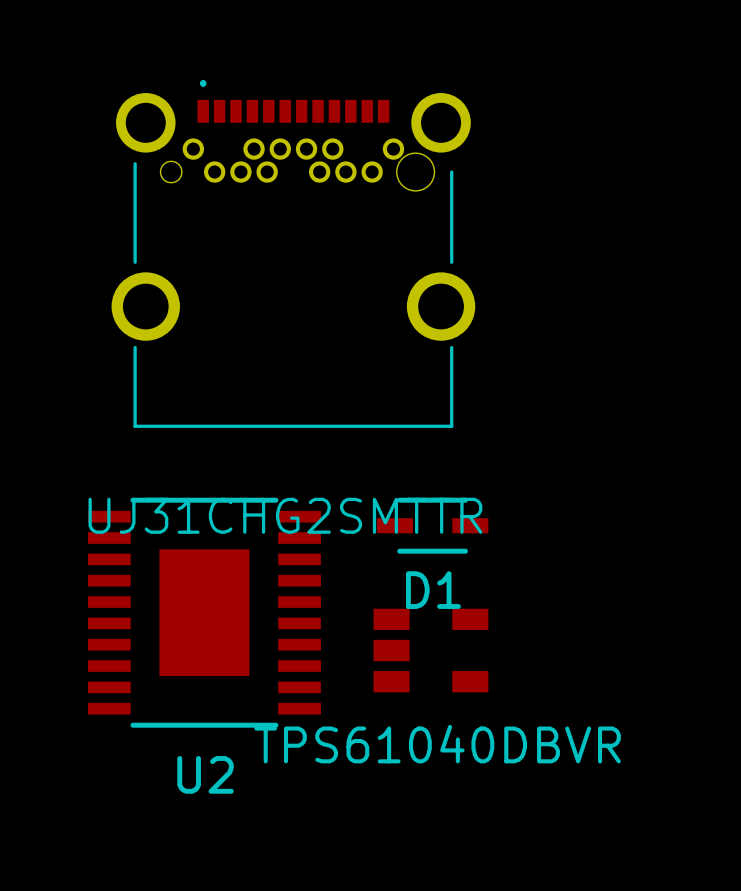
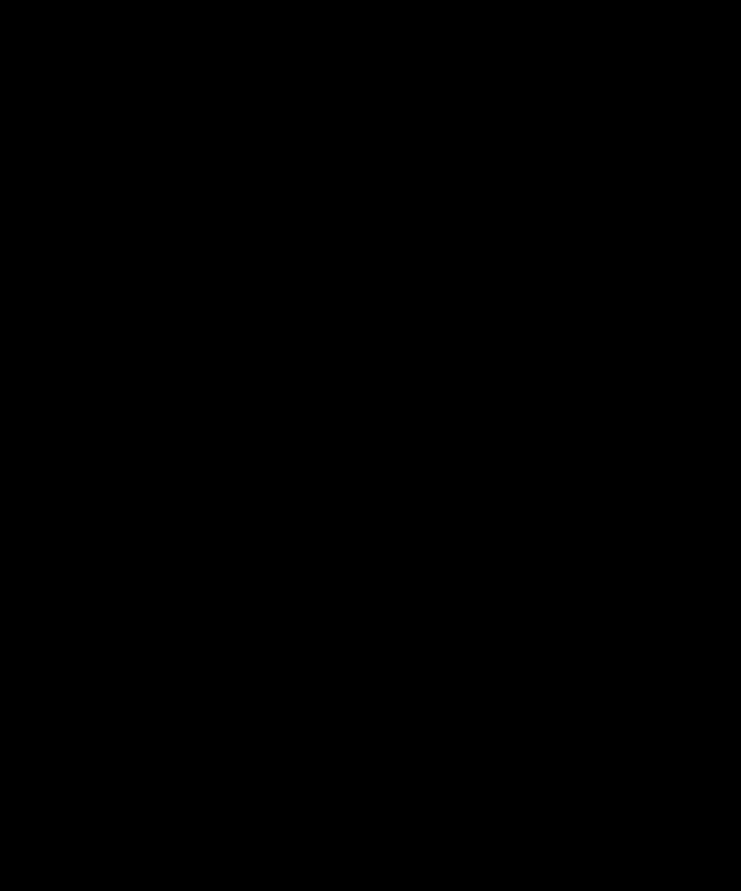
part: (293, 254) -> none
D1: (432, 525) -> none
U2: (204, 612) -> none
part: (430, 650) -> none

